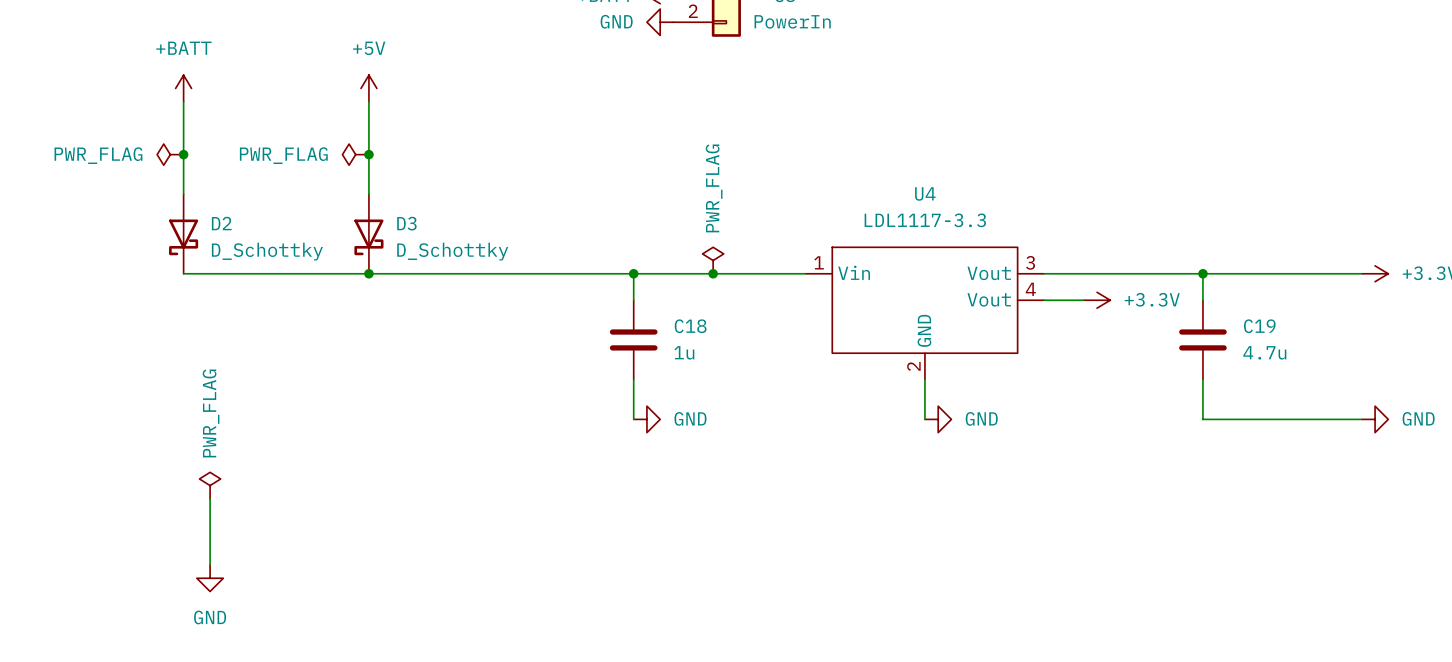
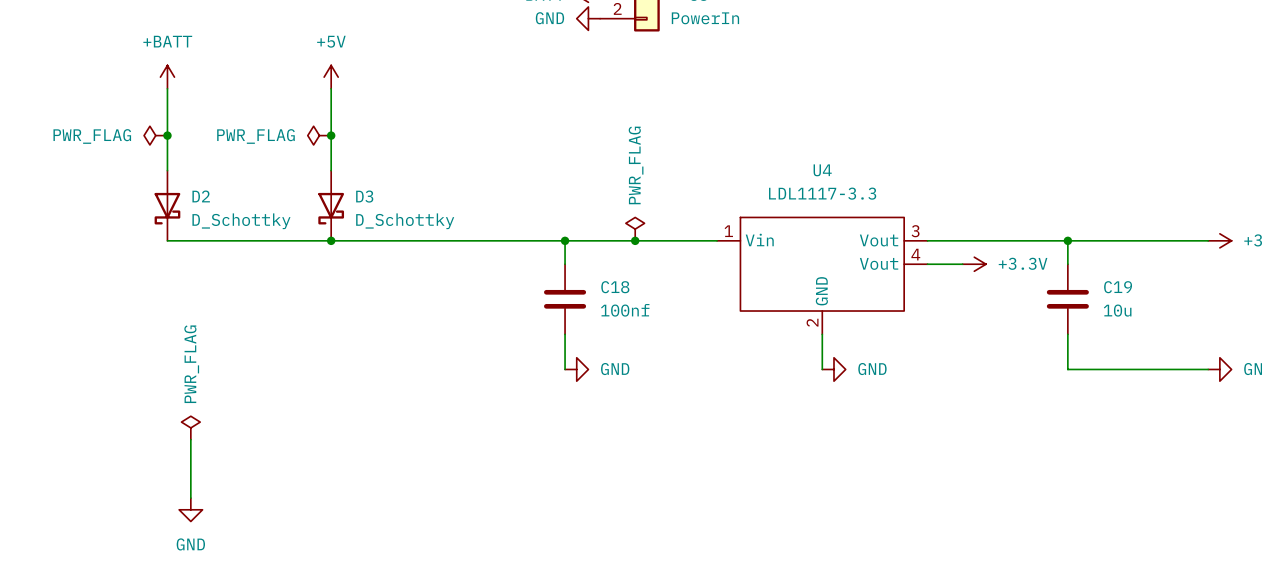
C18 value: 1u (684, 352) -> 100nf (625, 310)
C19 value: 4.7u (1264, 352) -> 10u (1117, 310)

